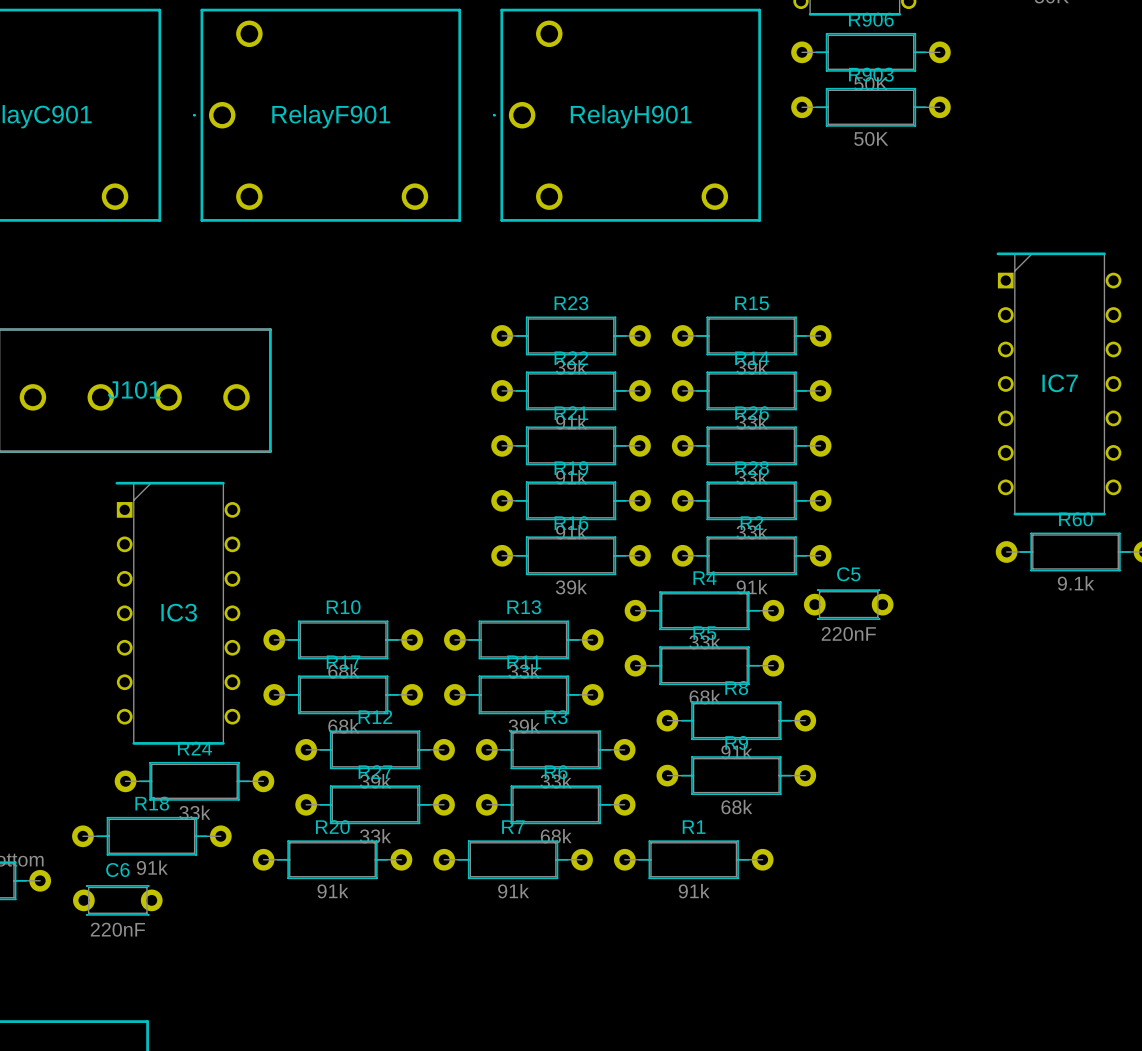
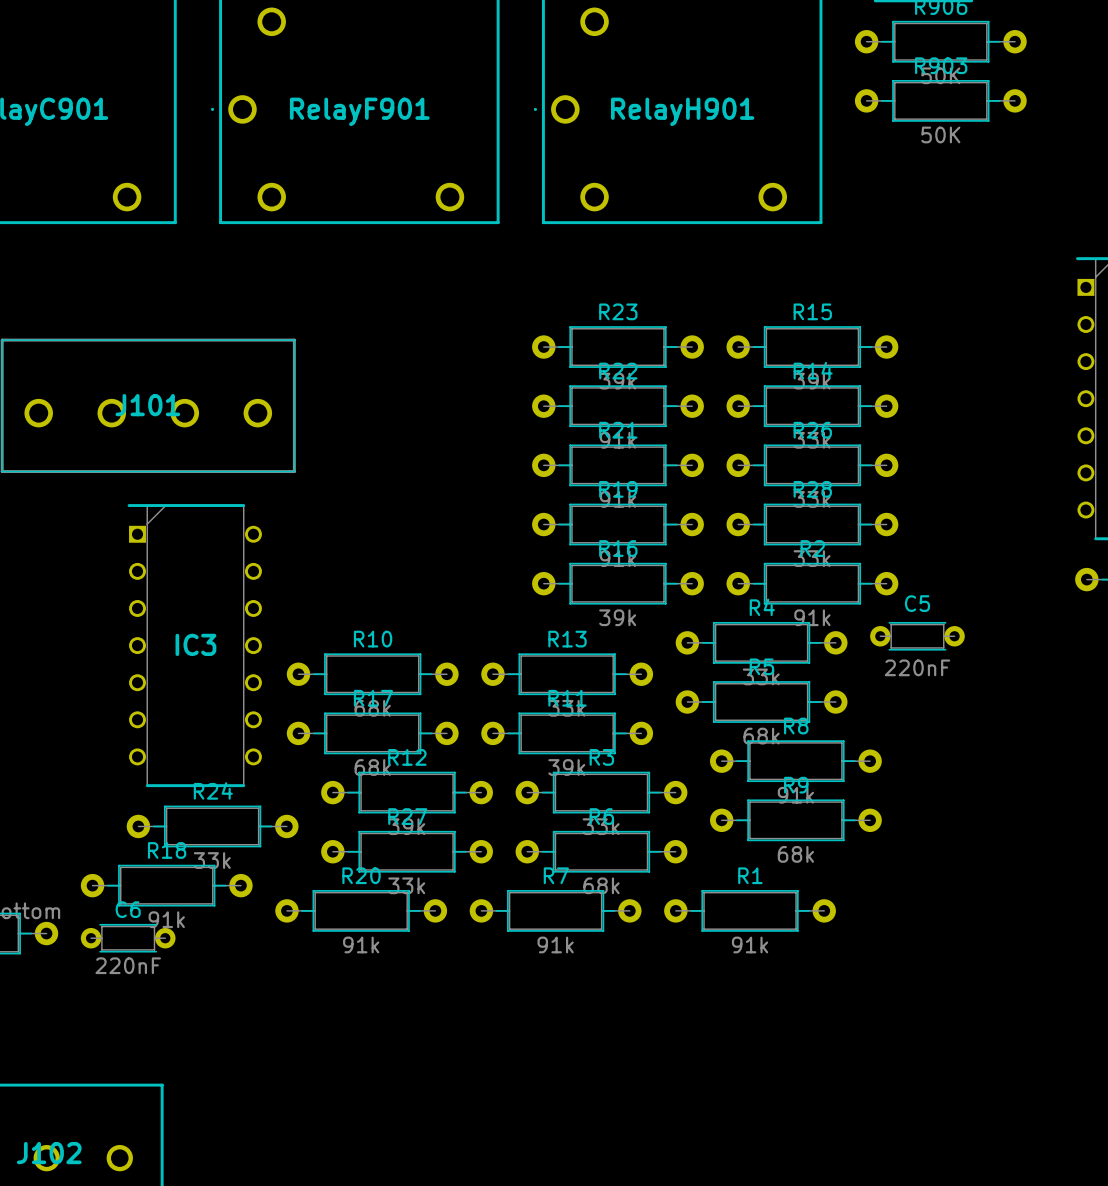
C5 footprint: [803, 589, 894, 620] -> [870, 621, 965, 651]
C6 footprint: [73, 885, 163, 916] -> [80, 923, 176, 953]

